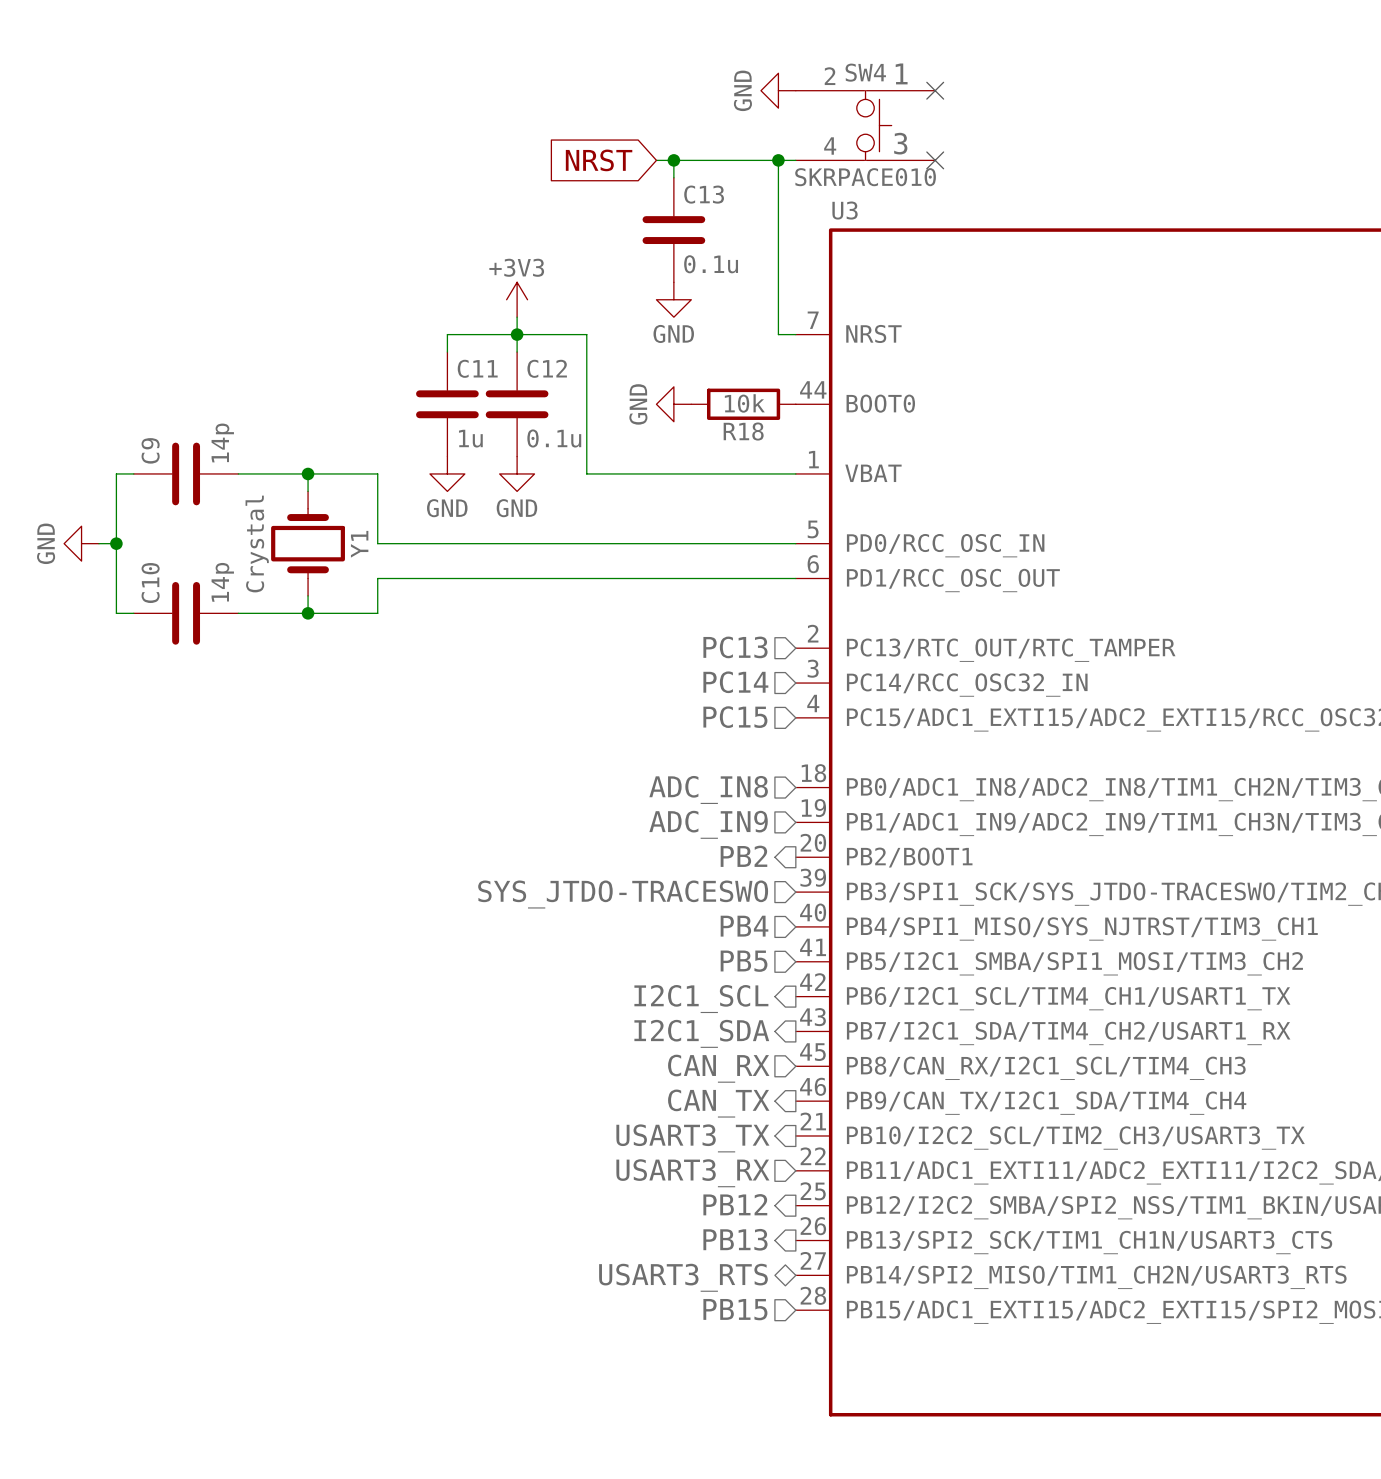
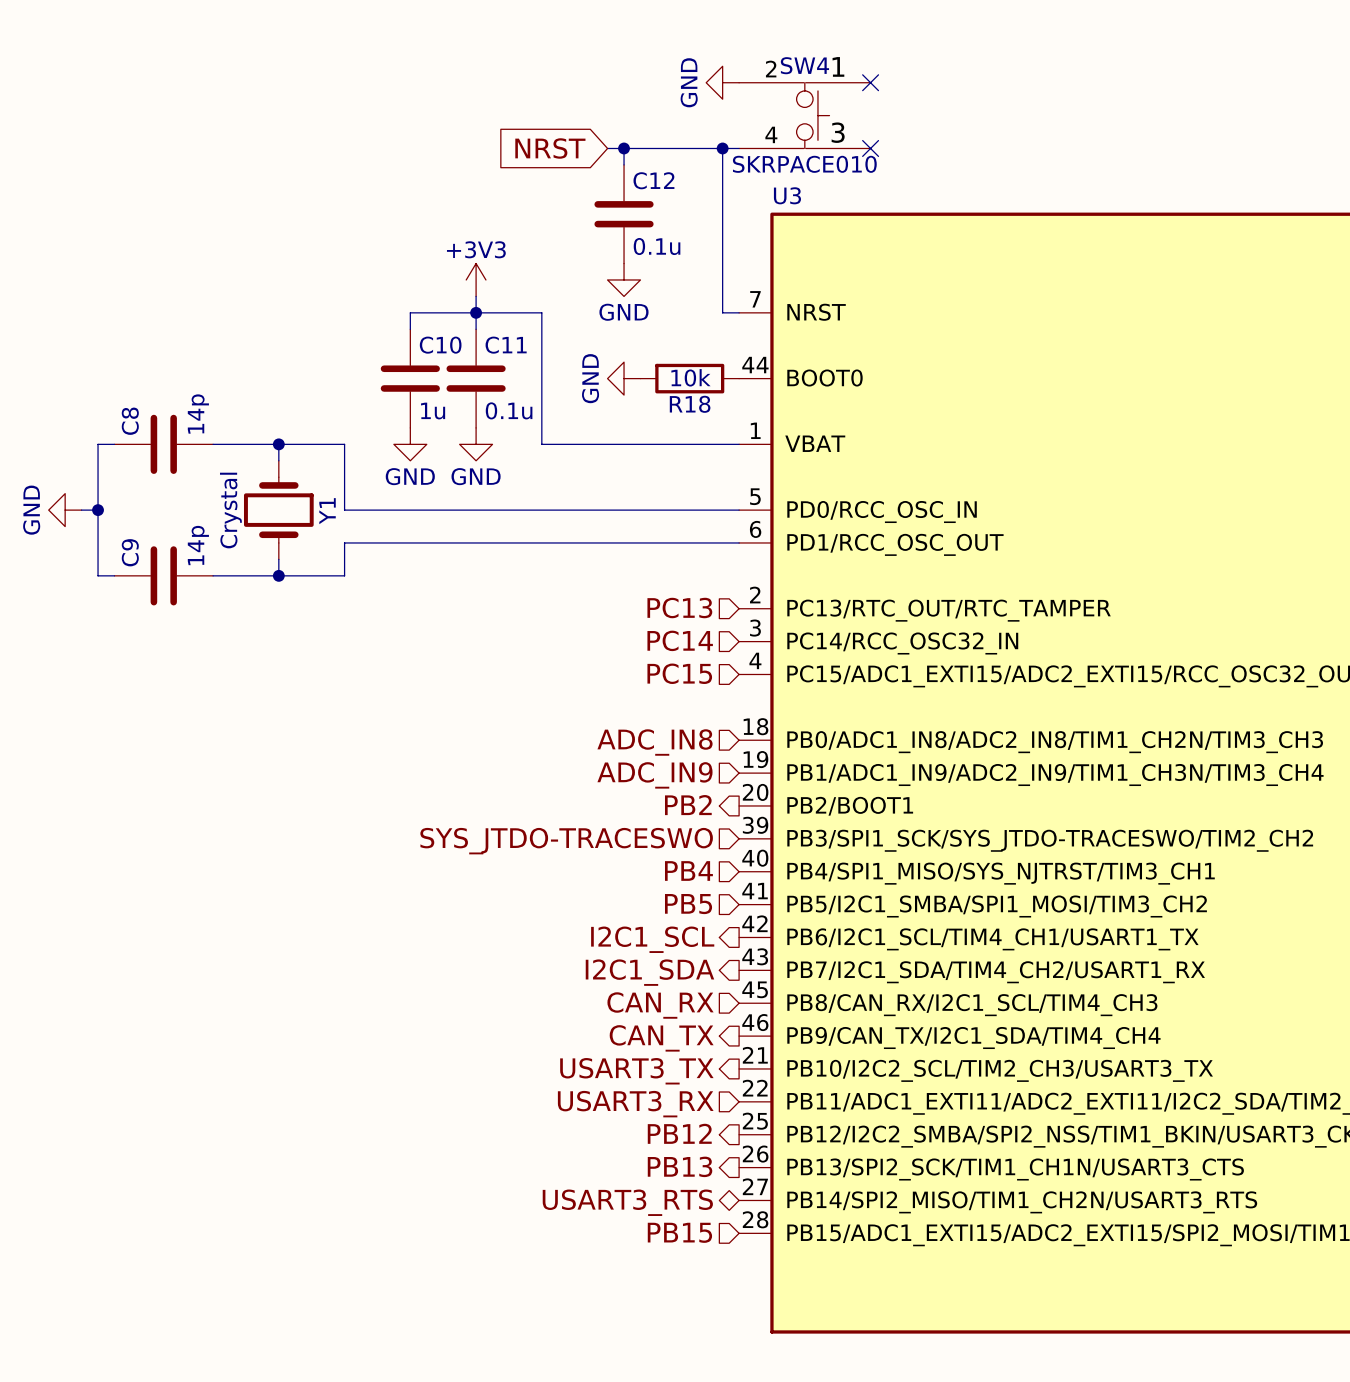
C13 name: C13 (704, 194) -> C12 (653, 180)
C11 name: C11 (477, 368) -> C10 (440, 345)
C12 name: C12 (547, 368) -> C11 (506, 345)
C9 name: C9 (150, 450) -> C8 (130, 421)
C10 name: C10 (150, 583) -> C9 (130, 552)

